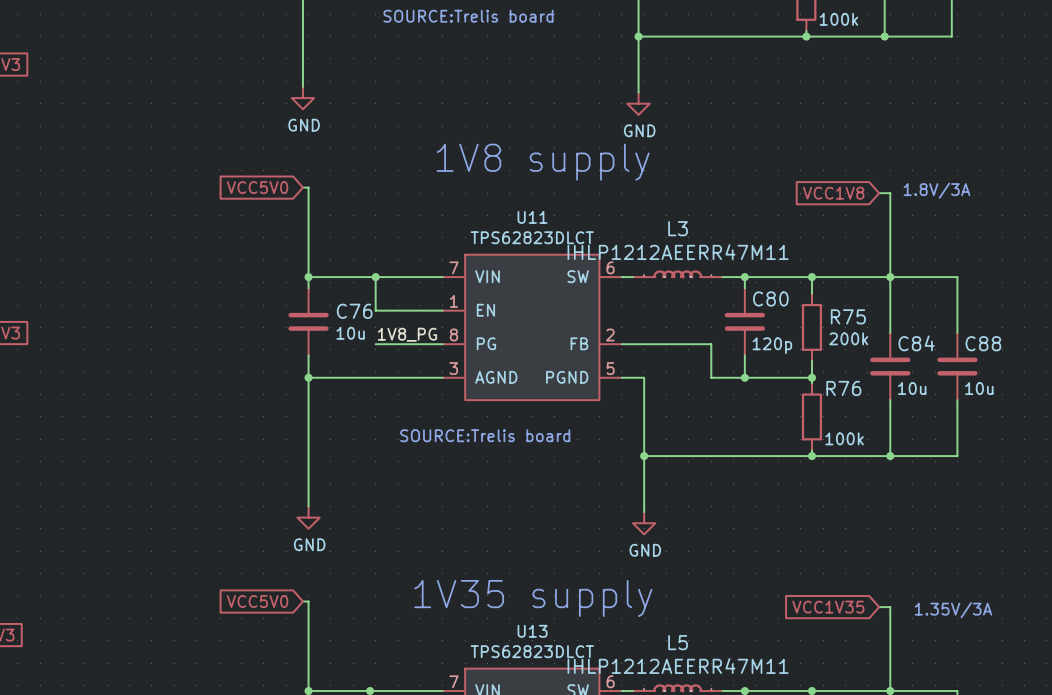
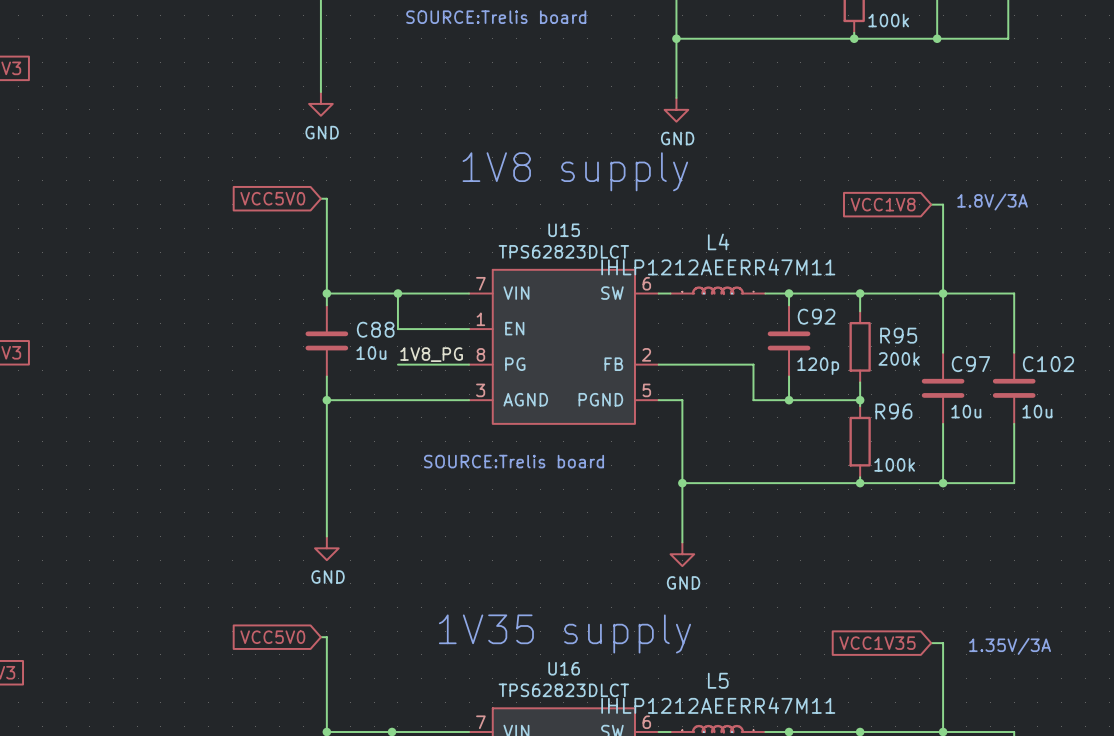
U11 name: U11 (532, 217) -> U15 (564, 230)
L3 name: L3 (678, 228) -> L4 (718, 241)
C80 name: C80 (770, 298) -> C92 (816, 316)
C76 name: C76 (354, 311) -> C88 (375, 329)
R75 name: R75 (848, 316) -> R95 (898, 335)
C84 name: C84 (916, 343) -> C97 (970, 364)
C88 name: C88 (983, 343) -> C102 (1048, 364)
R76 name: R76 (843, 388) -> R96 (893, 411)
U13 name: U13 (532, 631) -> U16 (564, 668)

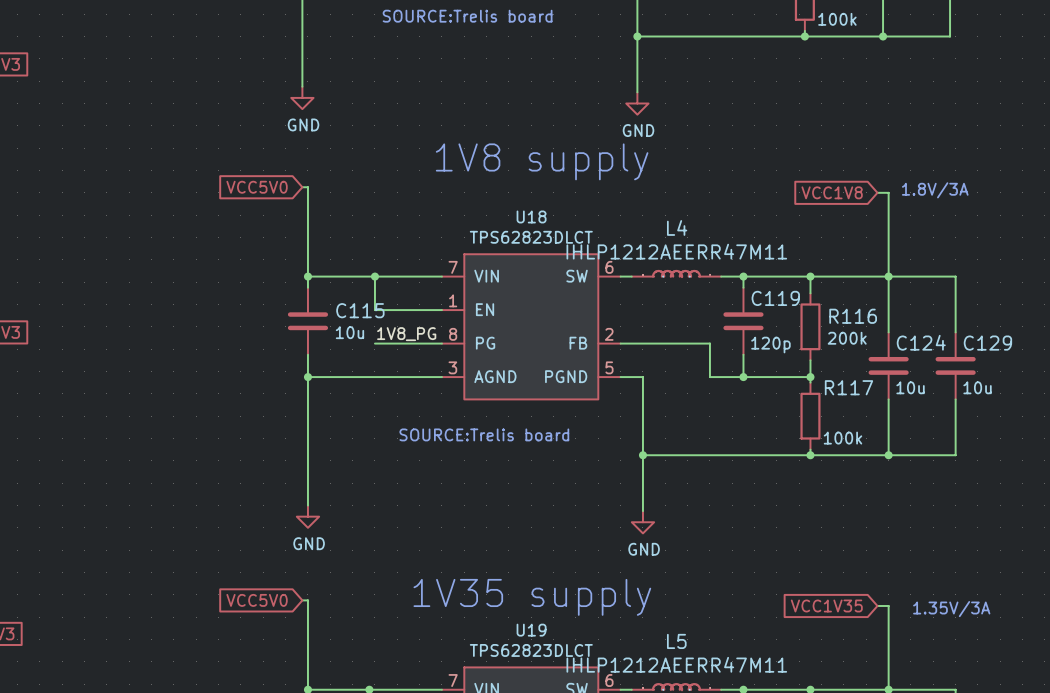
U15 name: U15 (564, 230) -> U18 (531, 216)
C92 name: C92 (816, 316) -> C119 (775, 298)
C88 name: C88 (375, 329) -> C115 (360, 310)
R95 name: R95 (898, 335) -> R116 (853, 316)
C97 name: C97 (970, 364) -> C124 (921, 342)
C102 name: C102 (1048, 364) -> C129 (987, 343)
R96 name: R96 (893, 411) -> R117 (849, 387)
U16 name: U16 (564, 668) -> U19 (531, 630)

